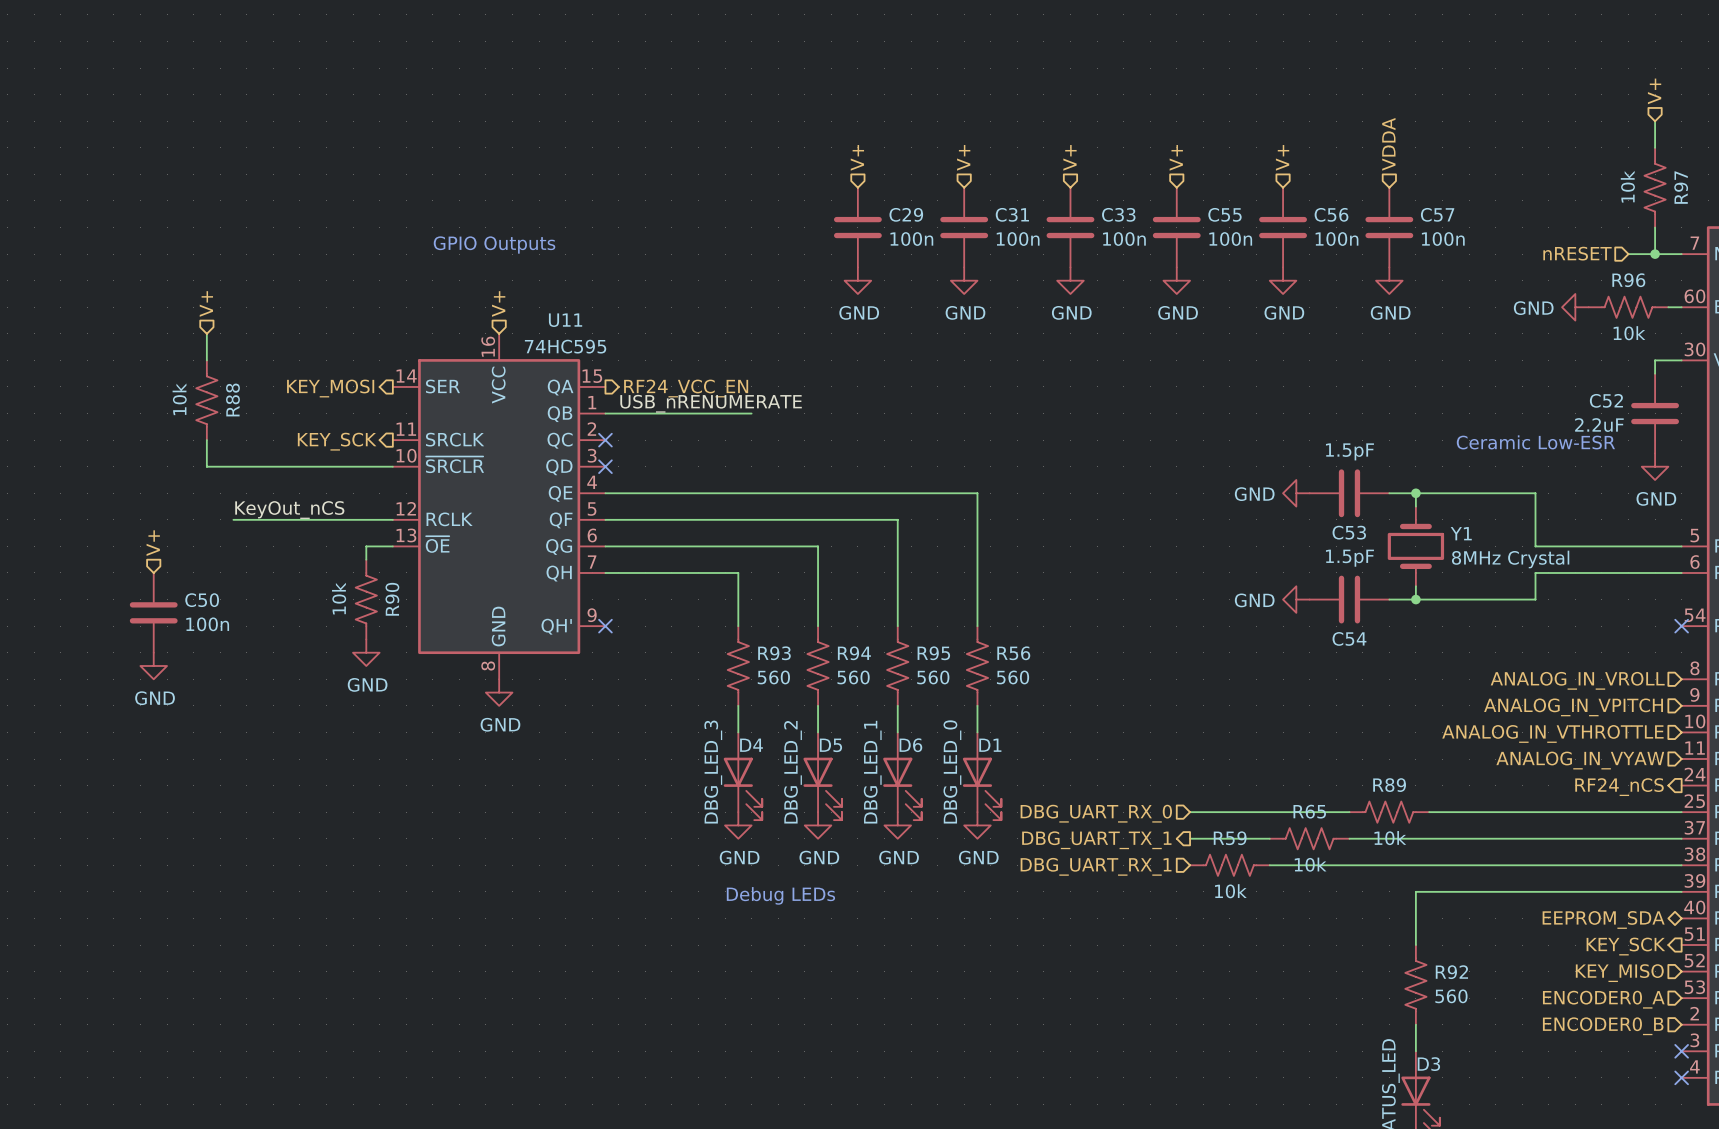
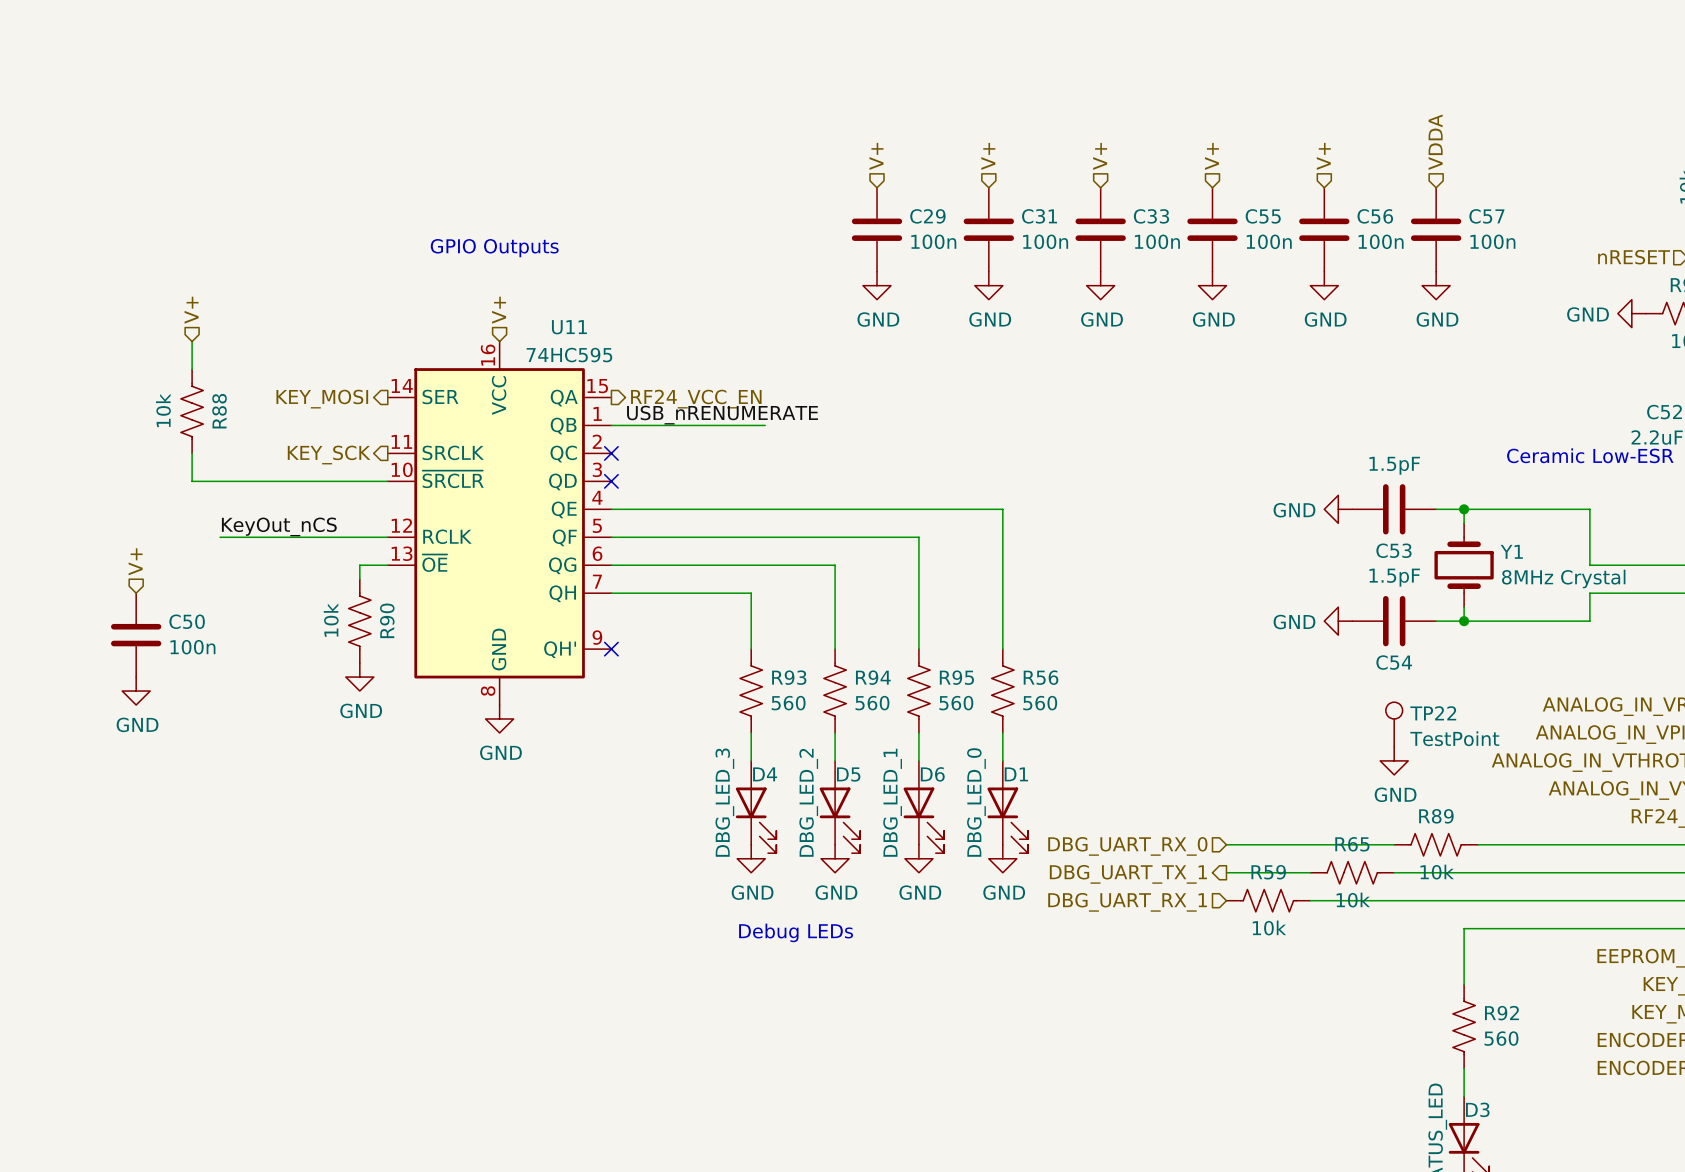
TP22: none -> TestPoint (1394, 724)
power symbol: none -> GND (1394, 760)

